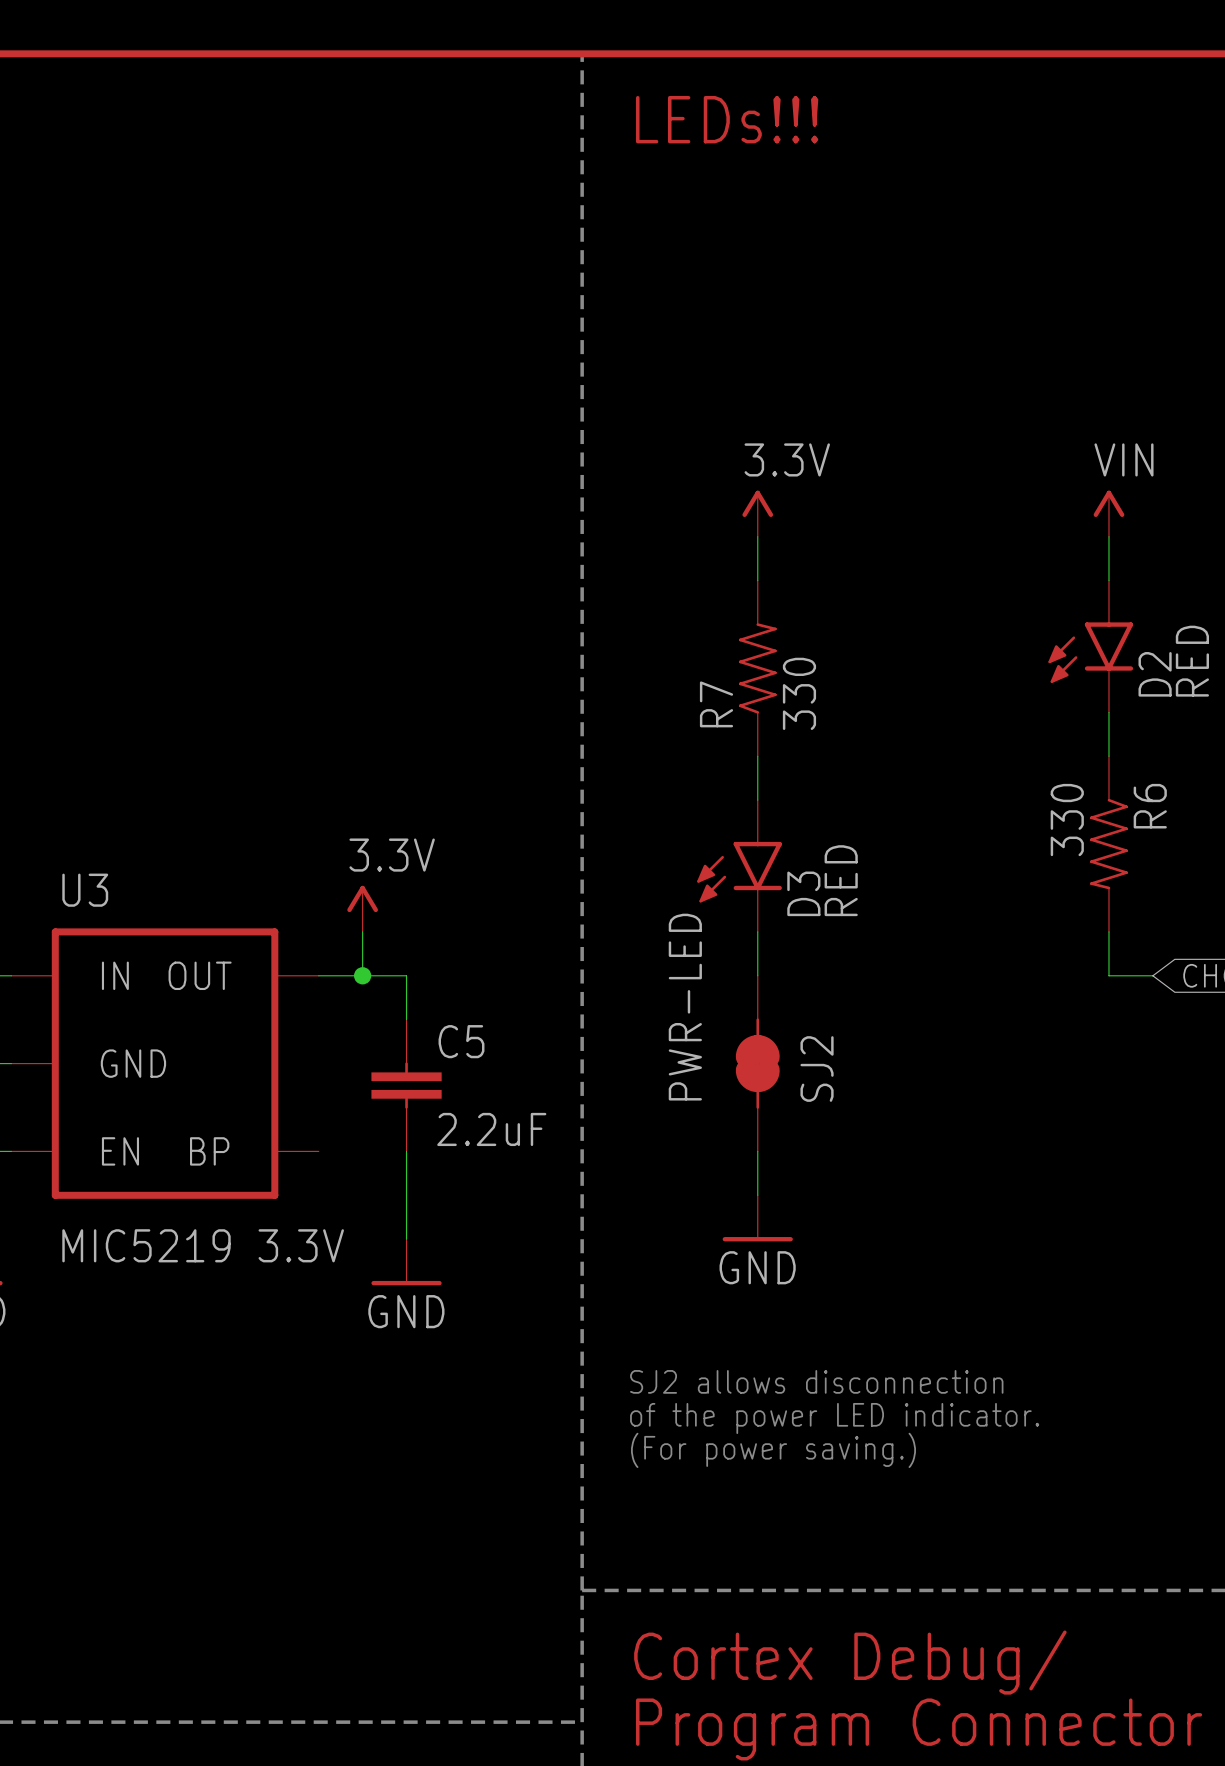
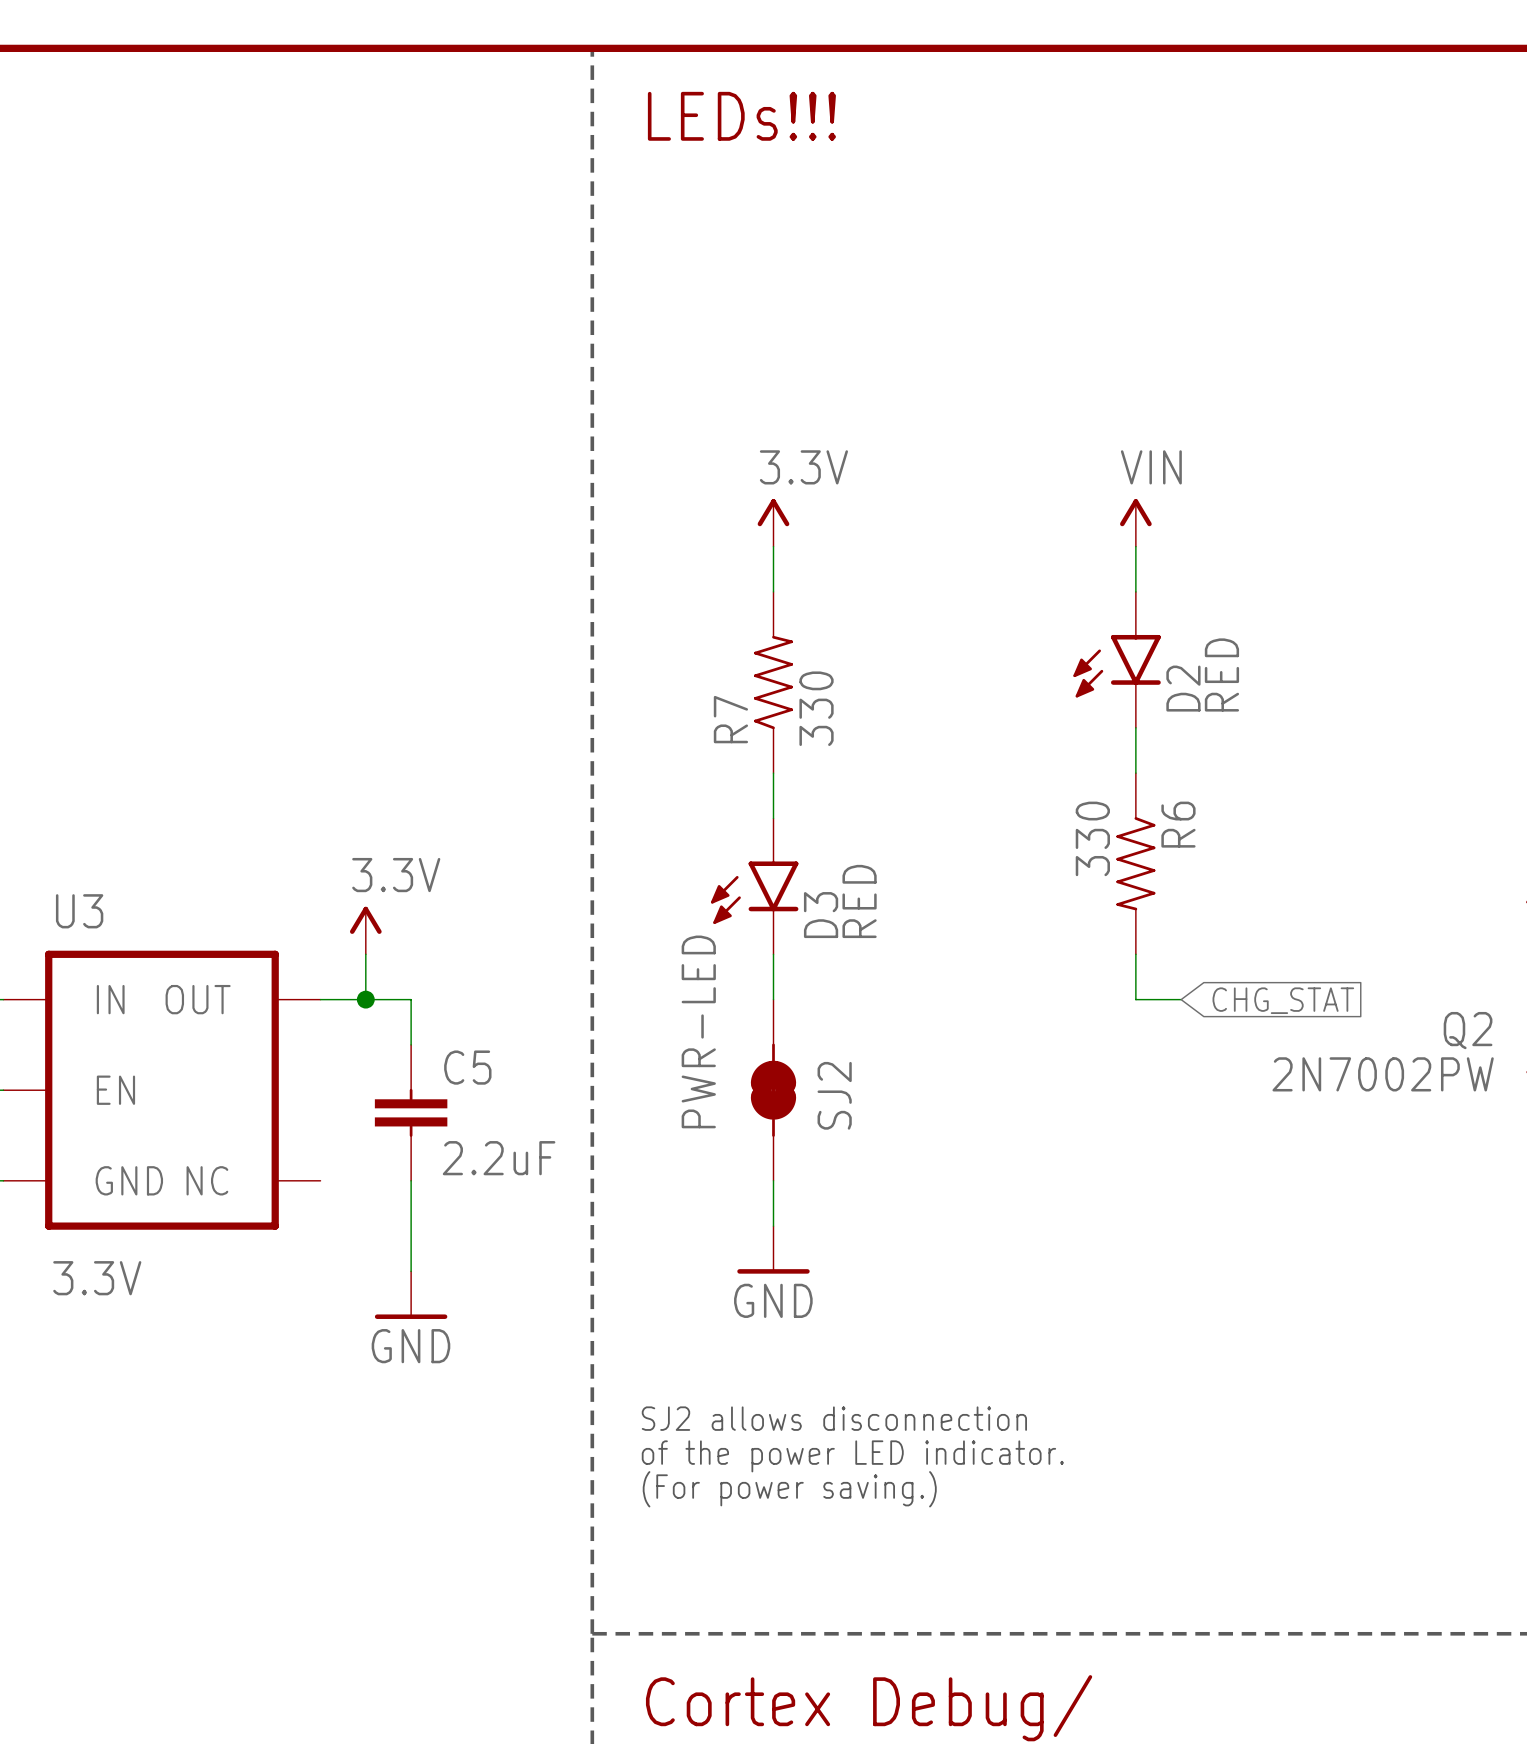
U3 pin name: GND (133, 1063) -> EN (115, 1090)
U3 pin name: EN (120, 1151) -> GND (129, 1180)
U3 pin name: BP (209, 1151) -> NC (207, 1180)
U3 value: MIC5219 3.3V (203, 1245) -> 3.3V (97, 1278)

